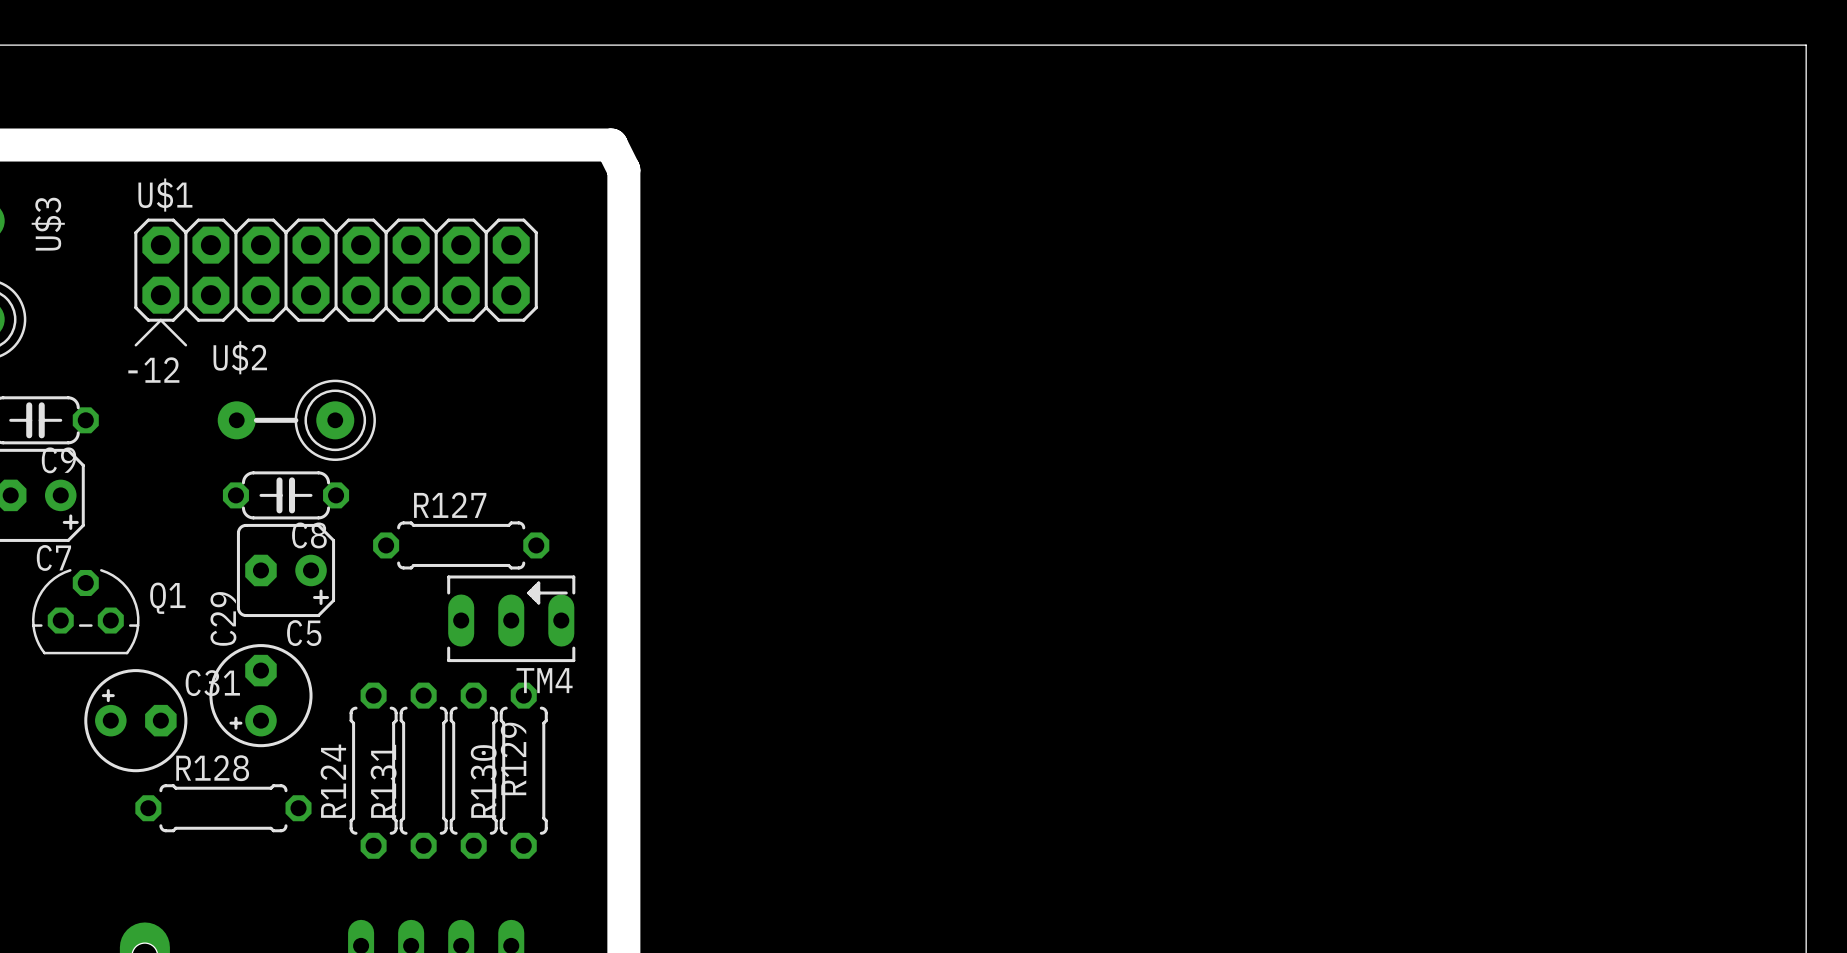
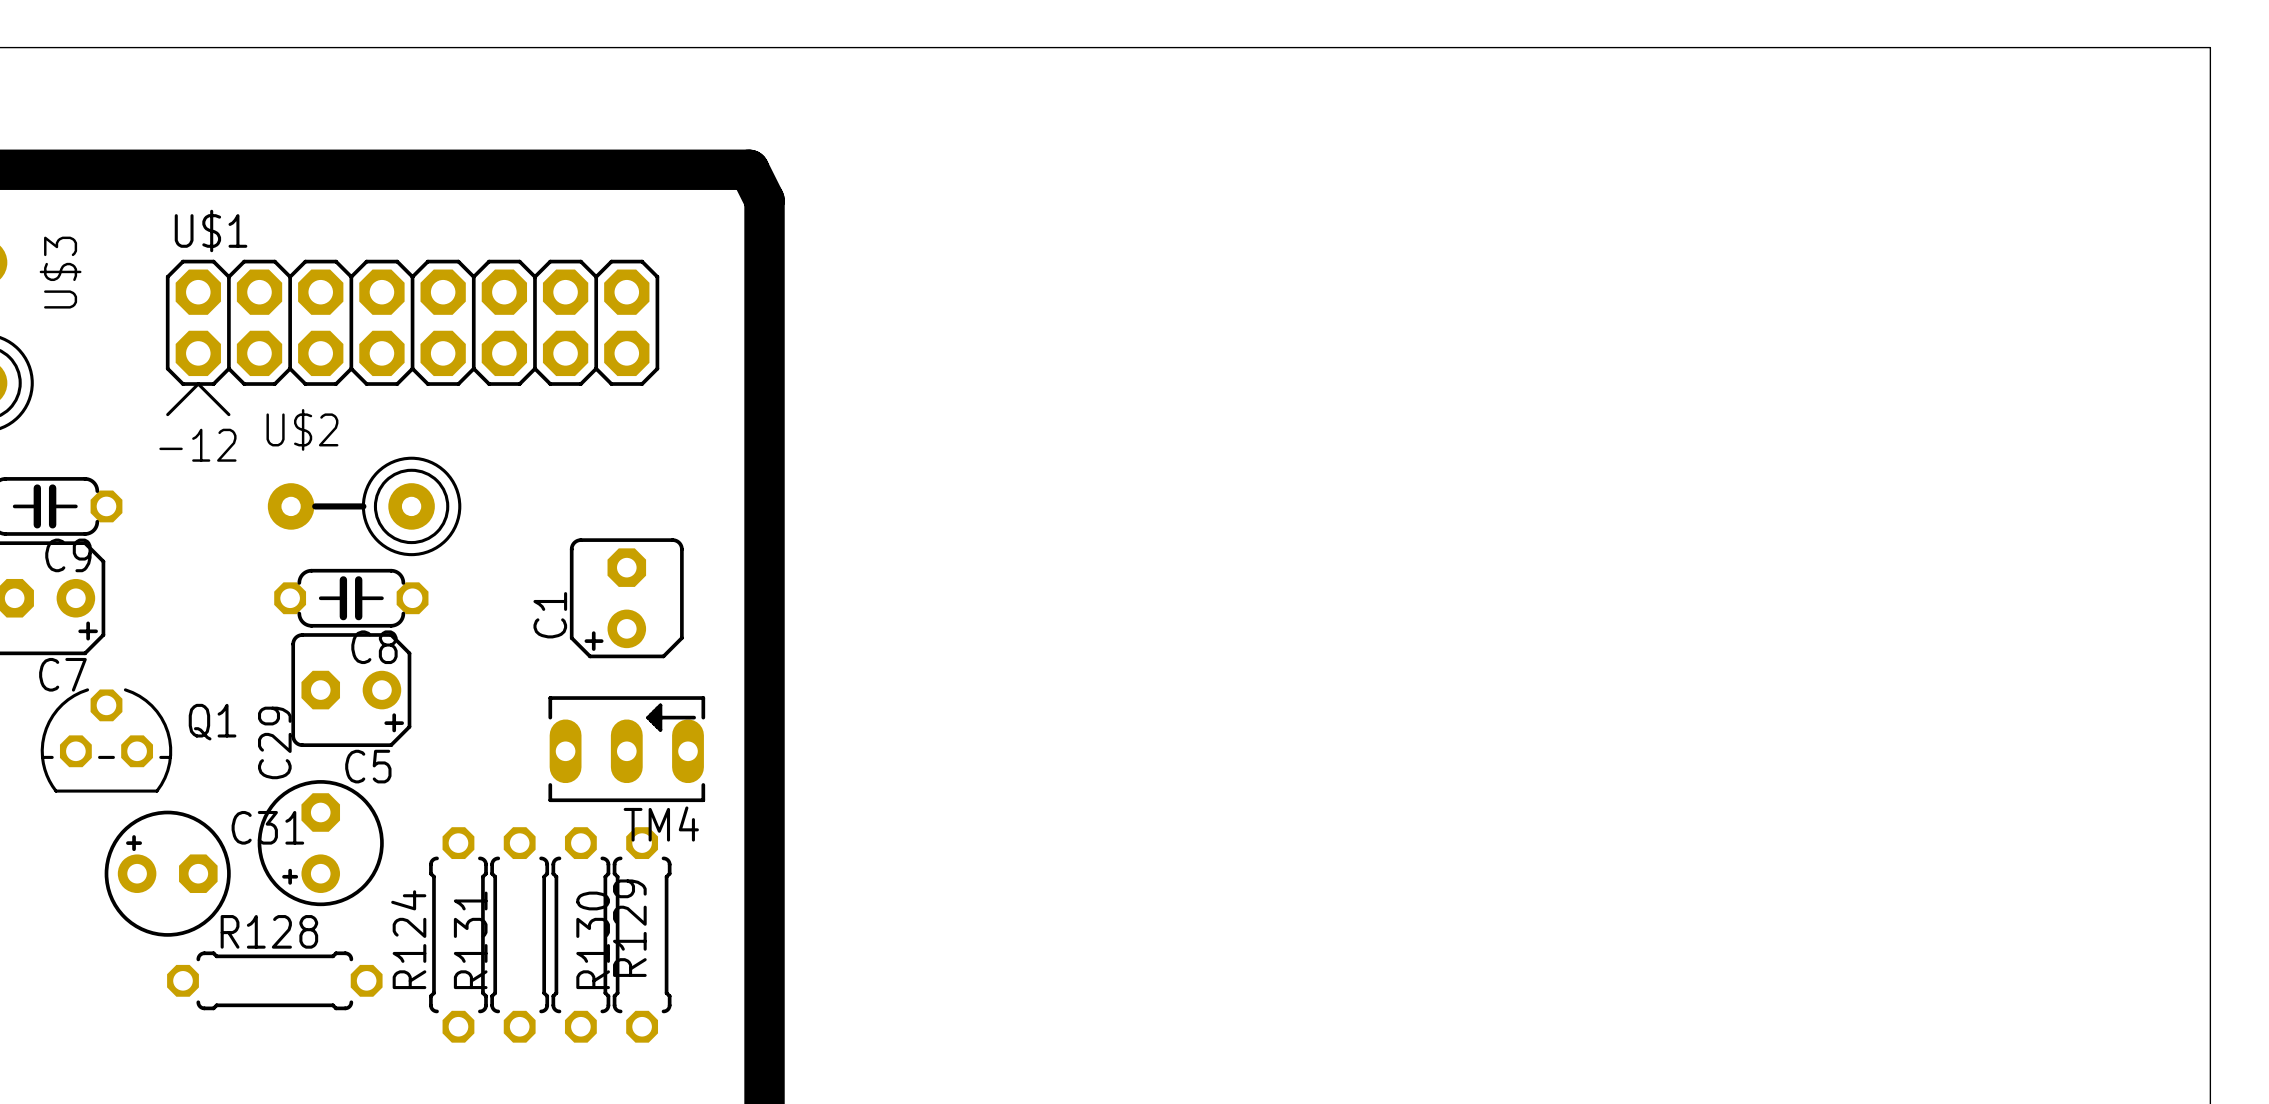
C1: none -> (626, 598)
R127: (461, 545) -> none

